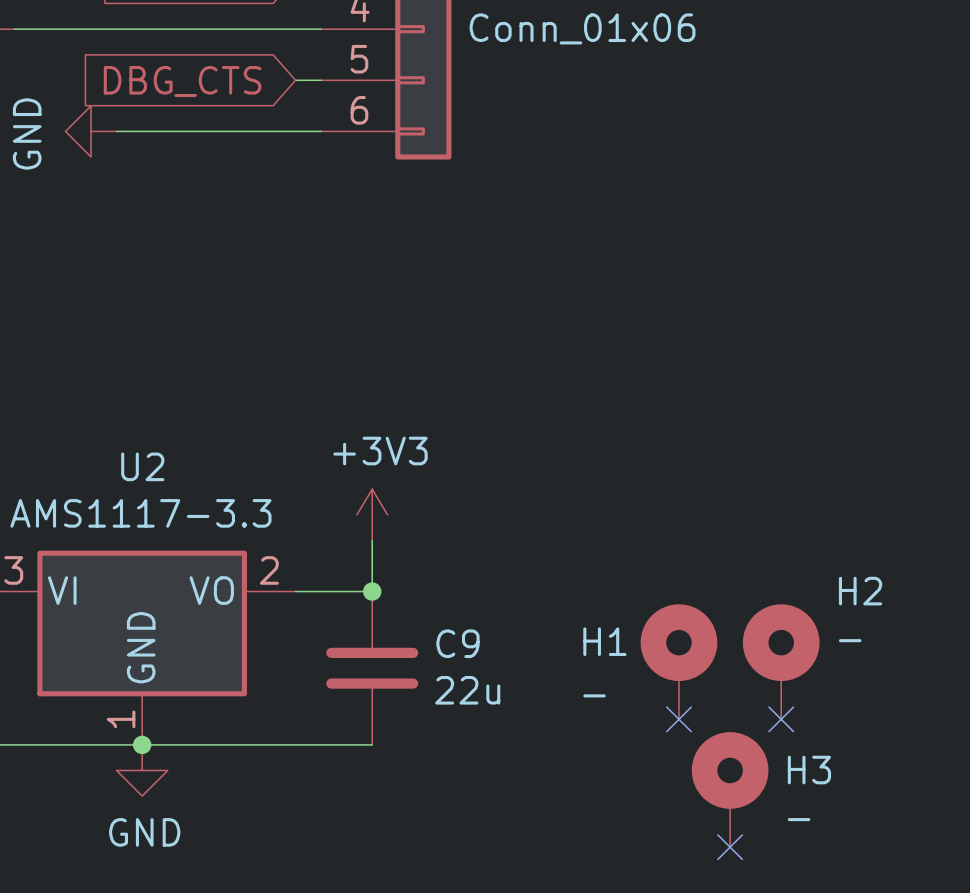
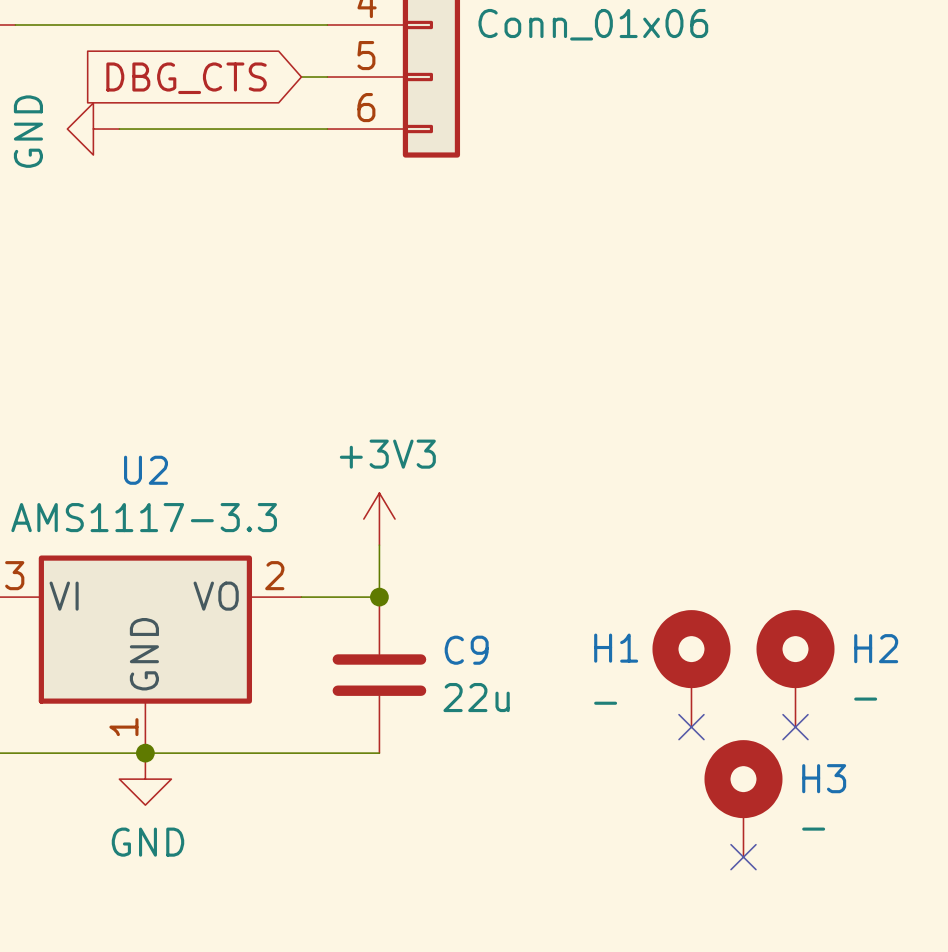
H2 name position: H2 (860, 591) -> H2 (876, 648)
H2 value position: - (850, 640) -> - (865, 699)

